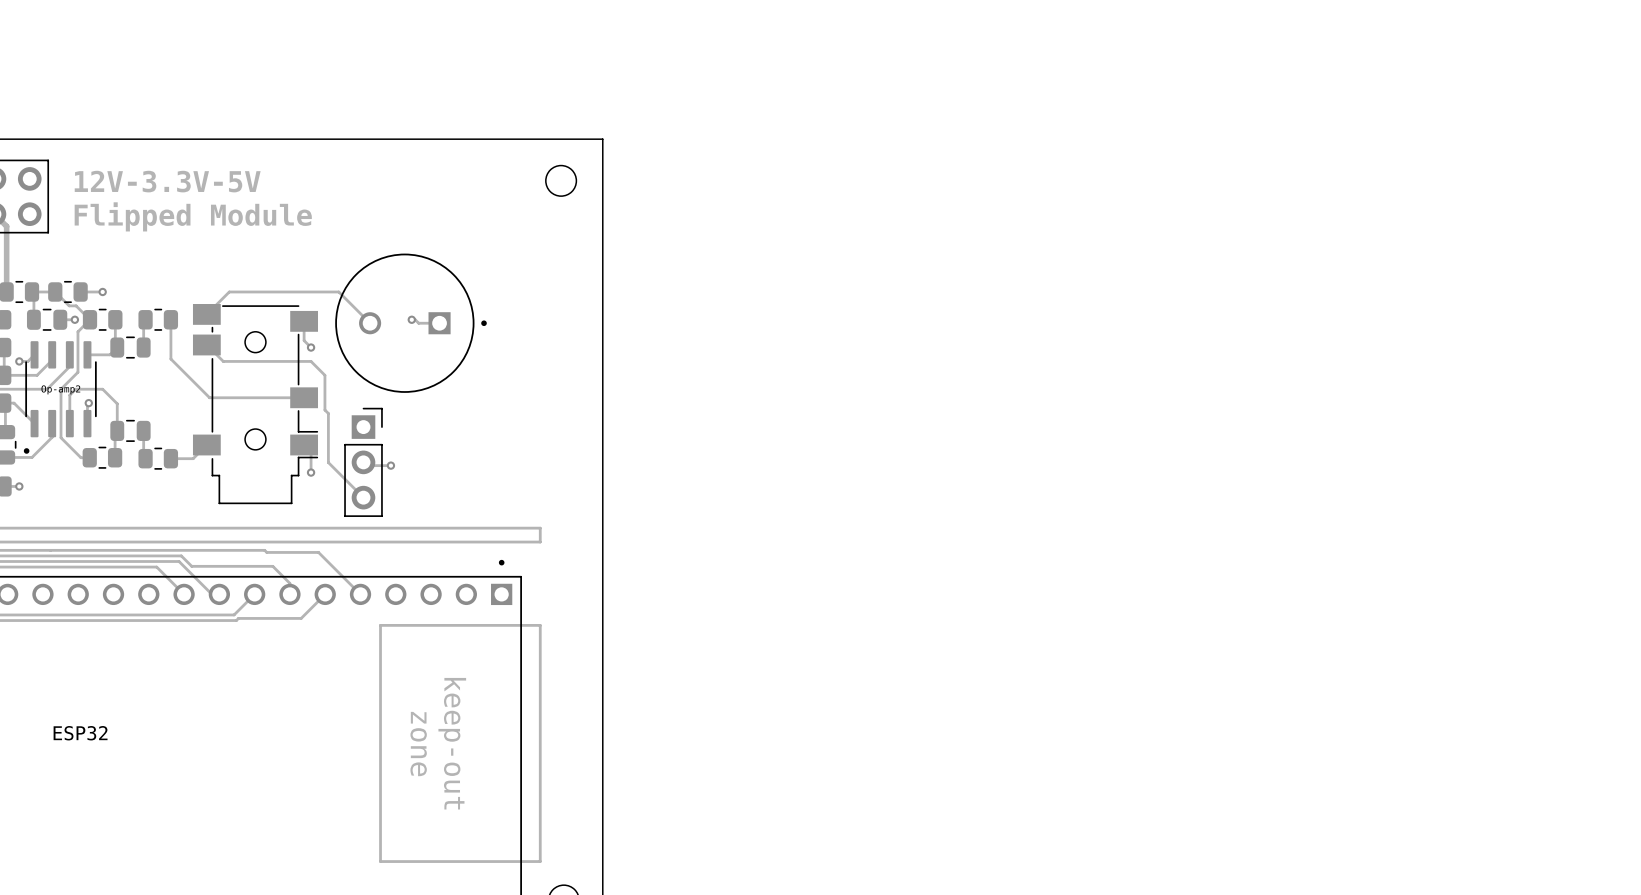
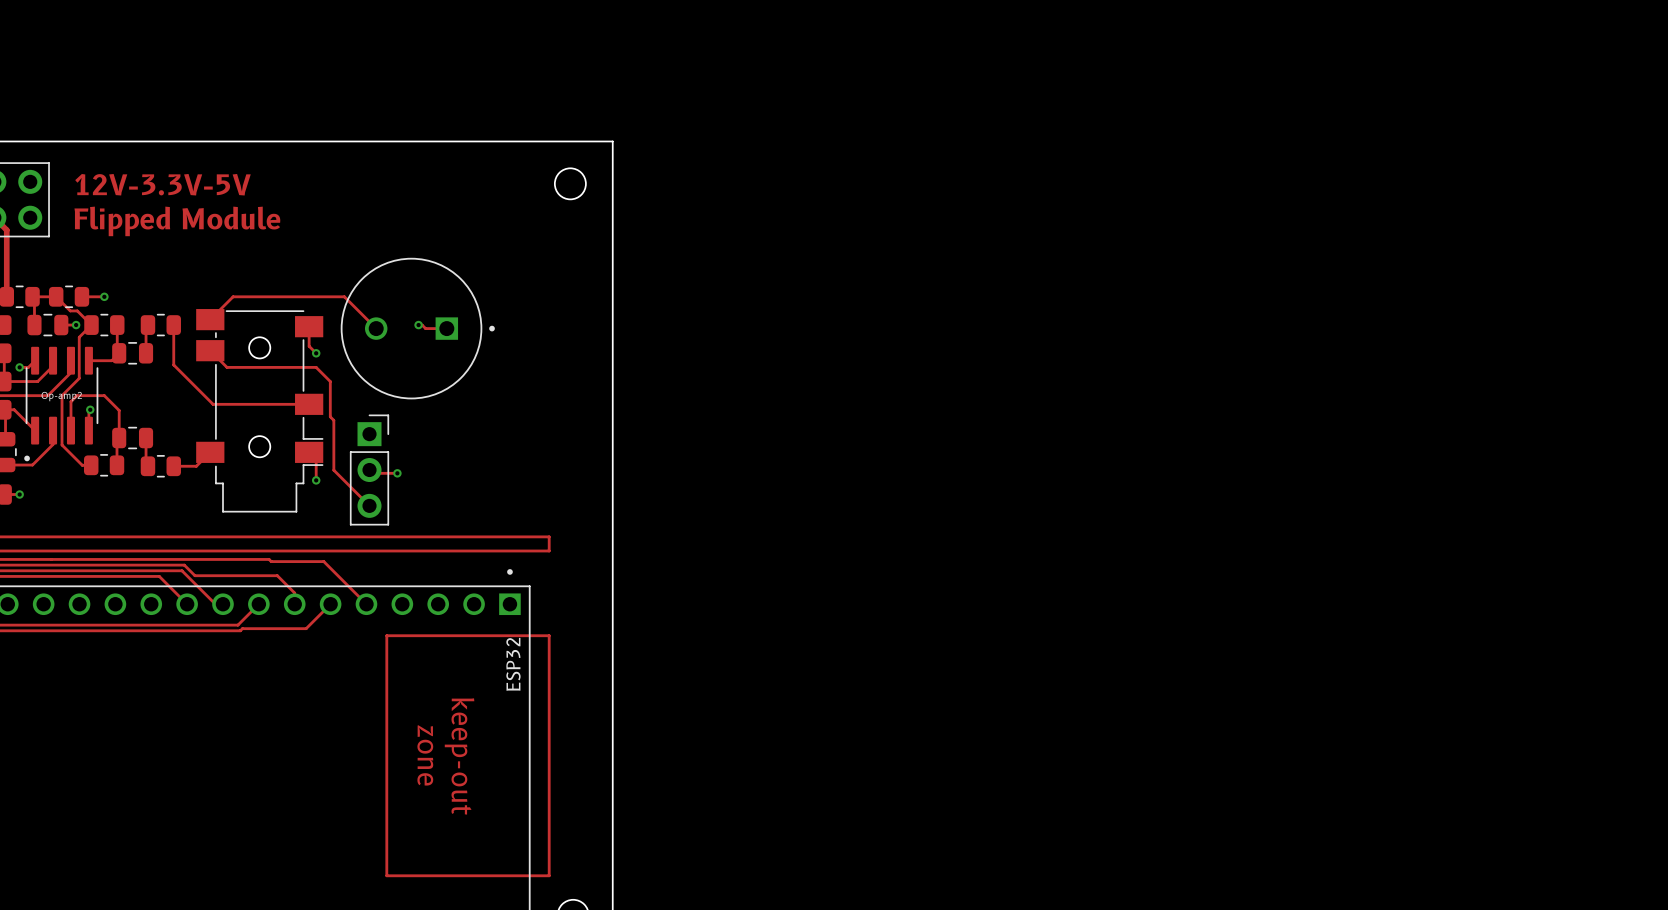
ESP32 name rotation: 0° (80, 733) -> 90° counterclockwise (513, 664)
ESP32 name position: ESP32 (80, 733) -> ESP32 (513, 664)

